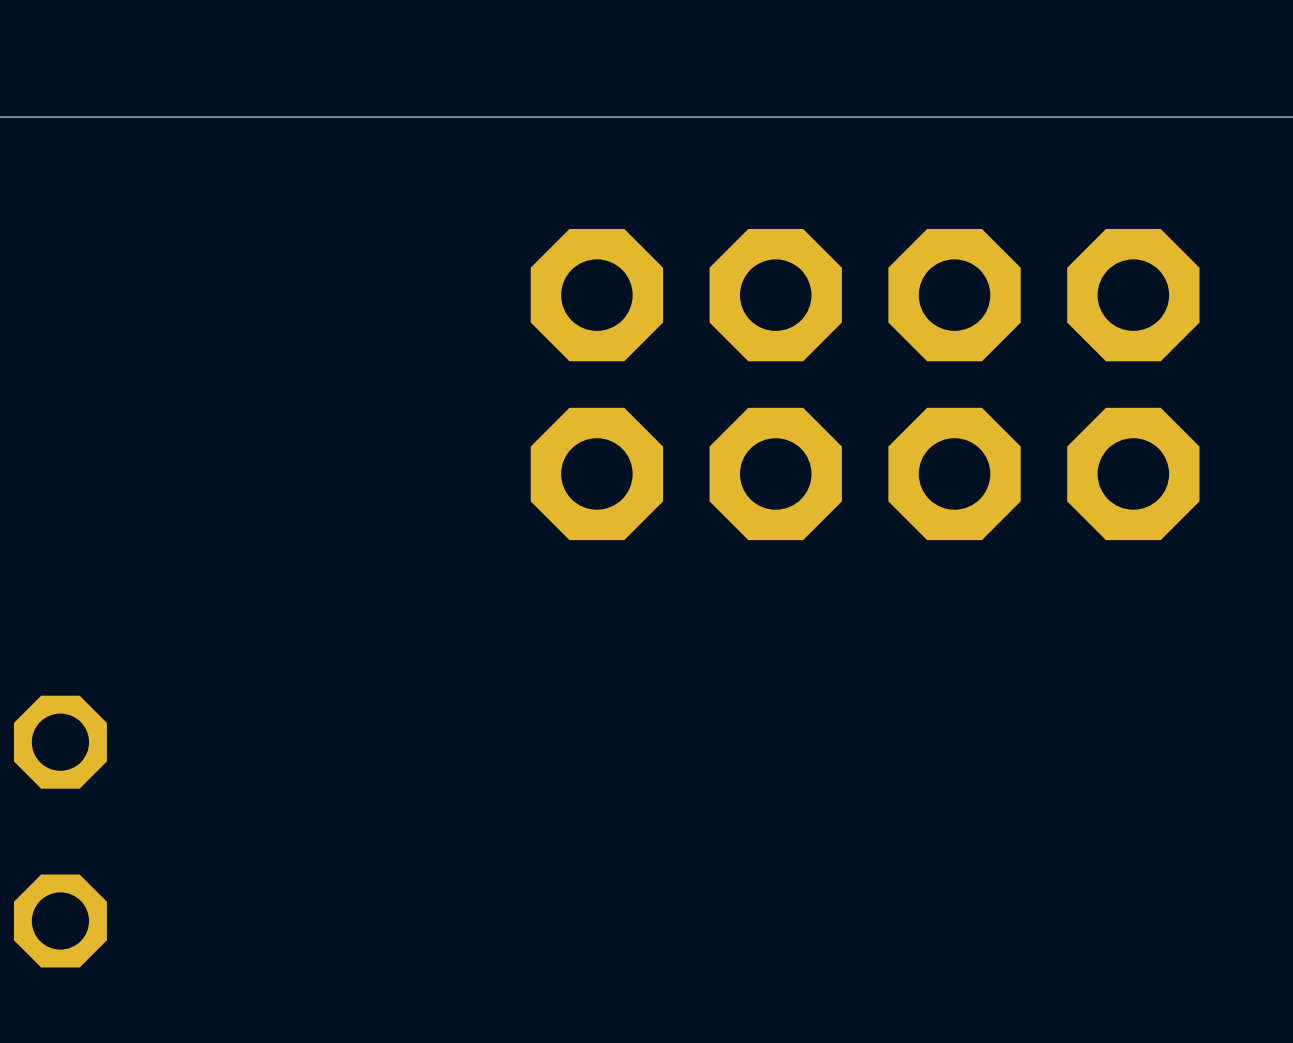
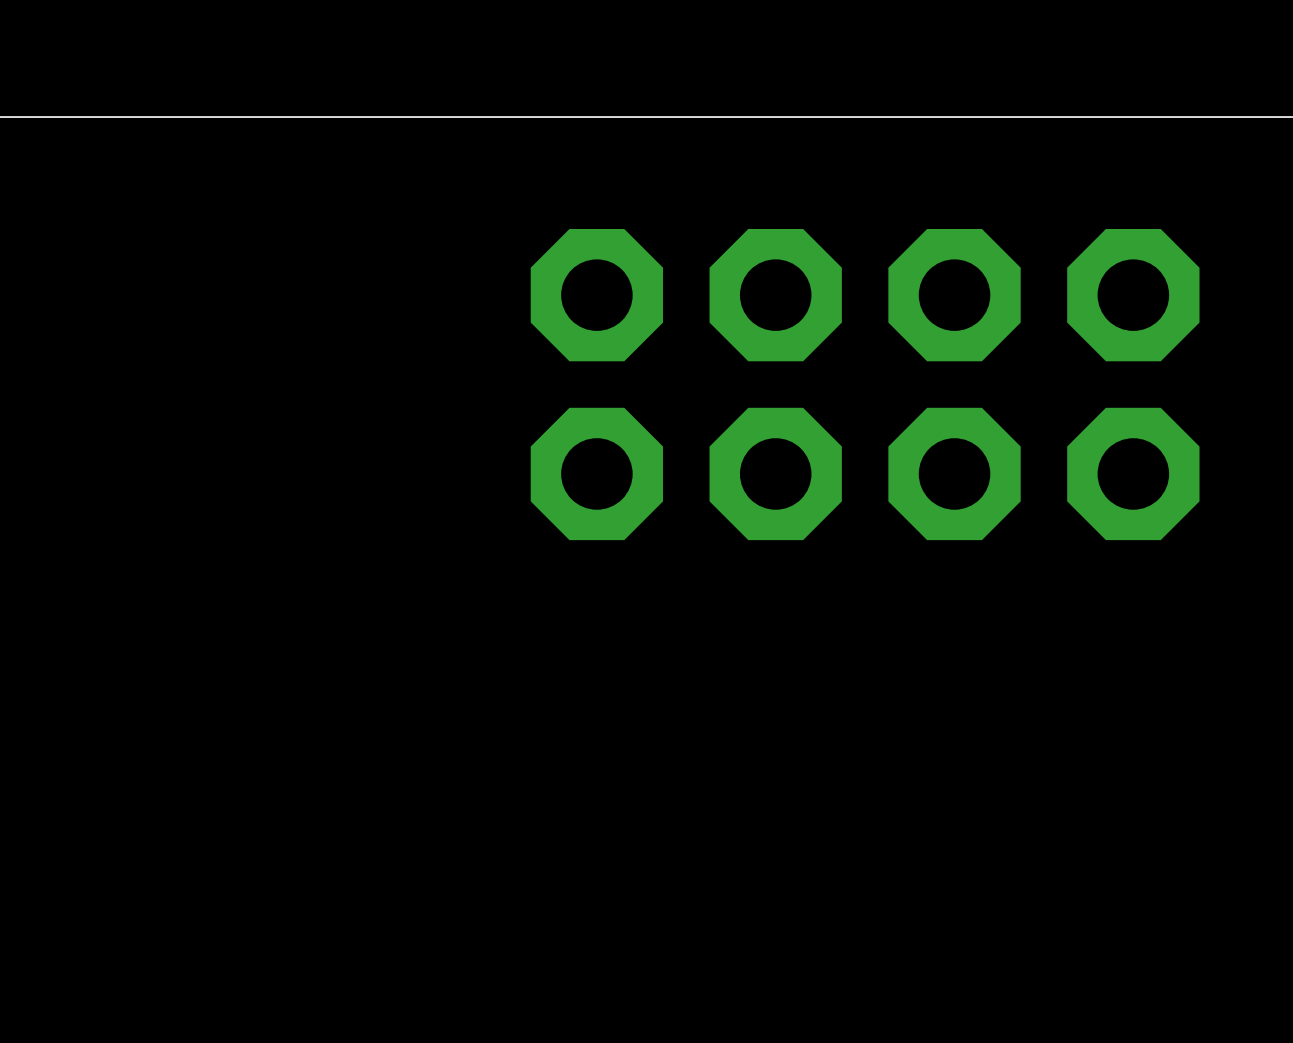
part: (60, 831) -> none

